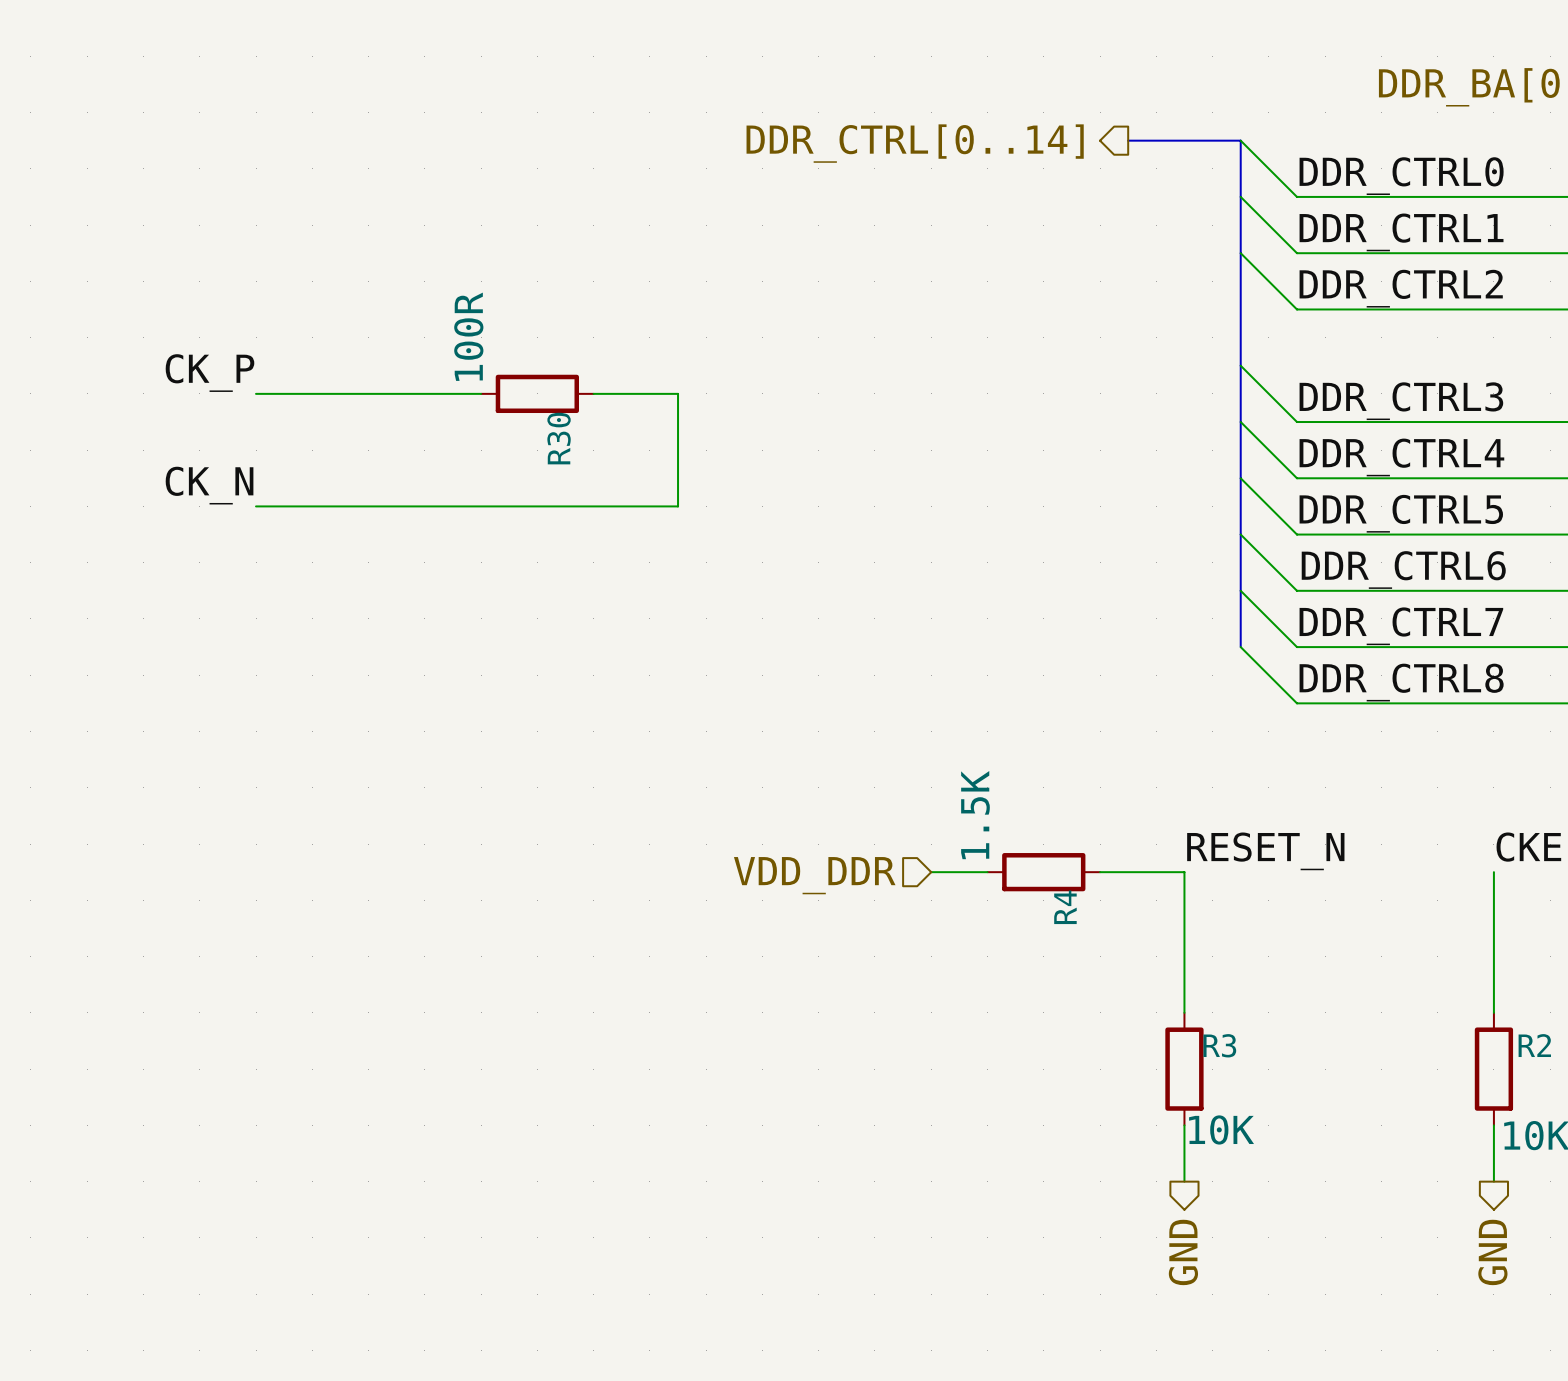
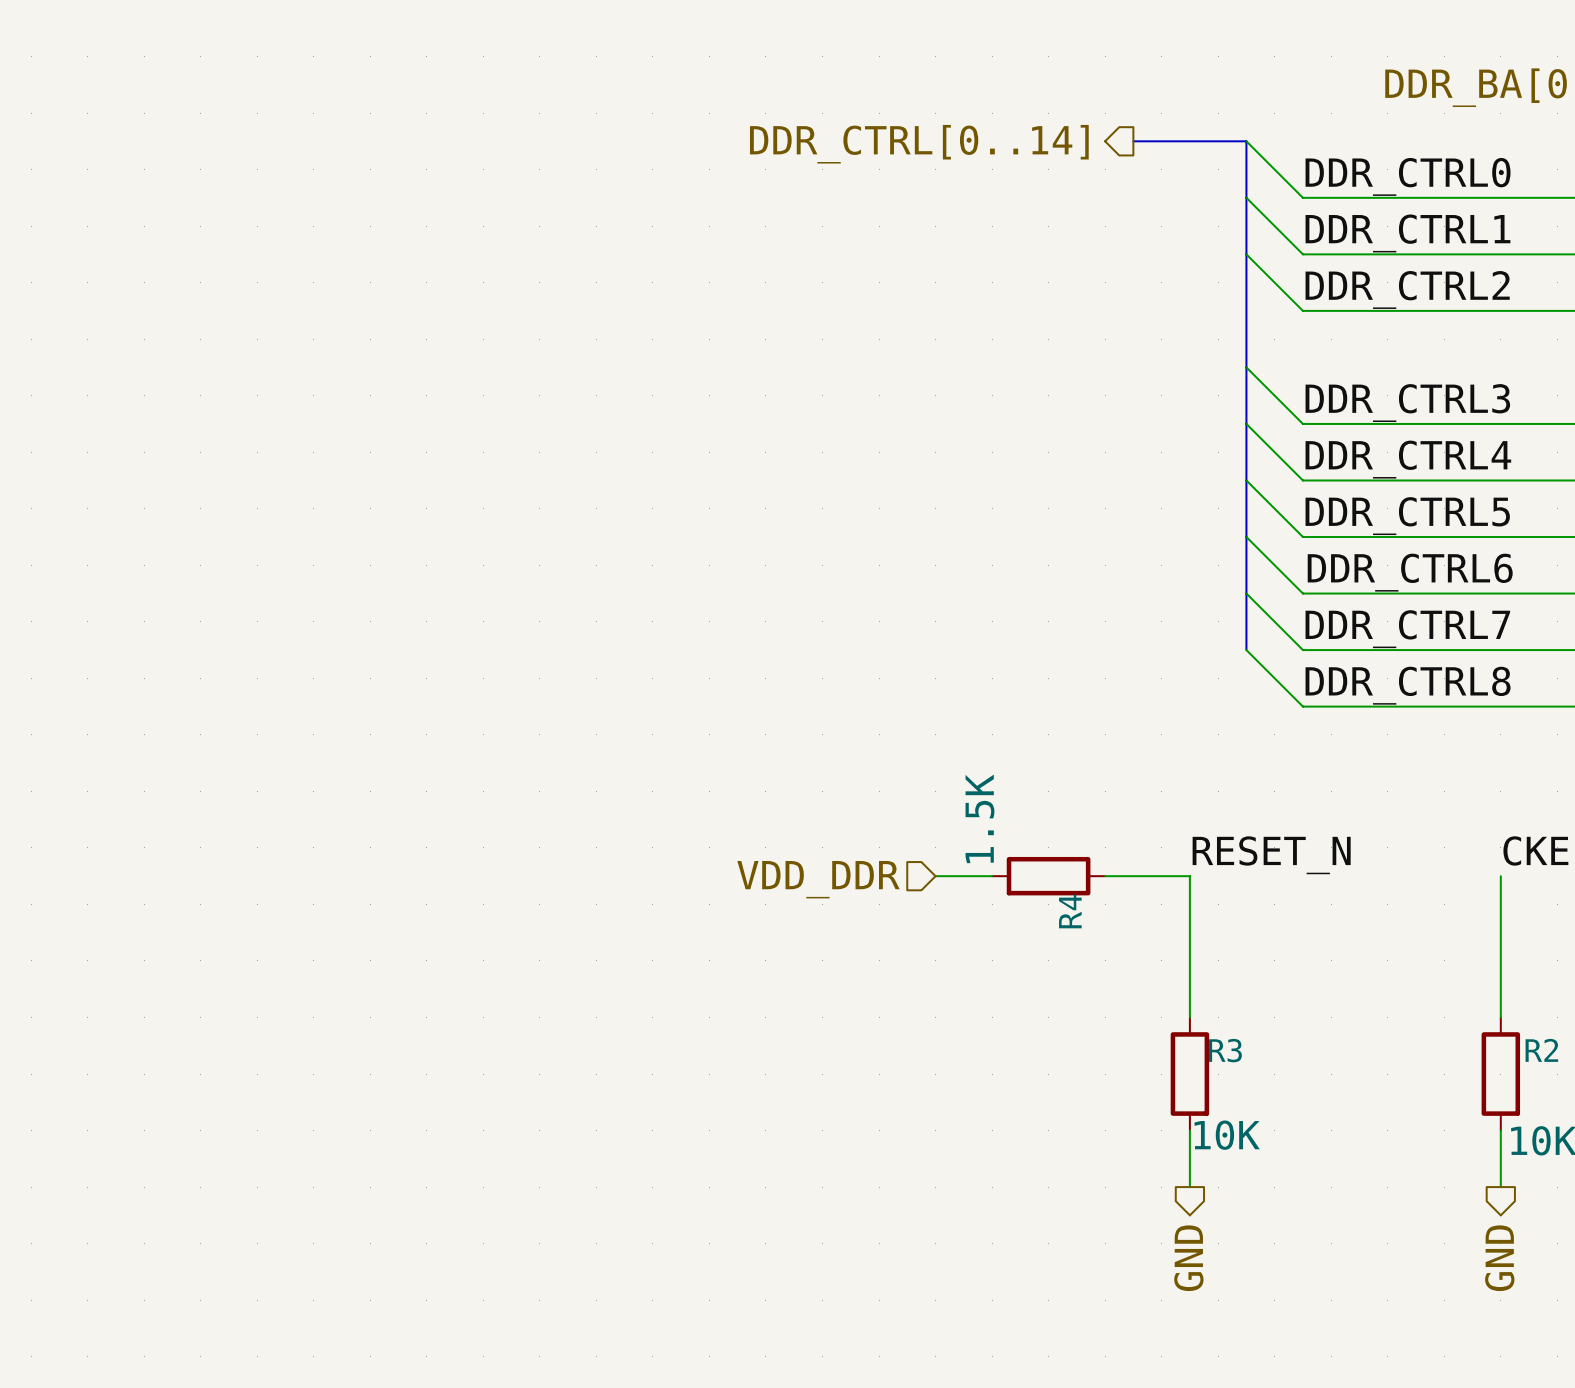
label: CK_P (209, 373) -> none
wire: (256, 393) (481, 393) -> none
R30: 100R (537, 393) -> none
wire: (593, 393) (678, 393) (678, 506) (256, 506) -> none
label: CK_N (209, 485) -> none

